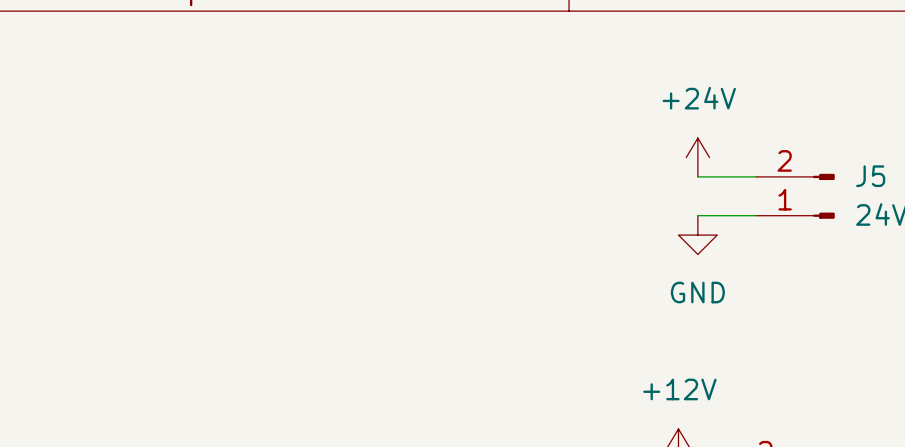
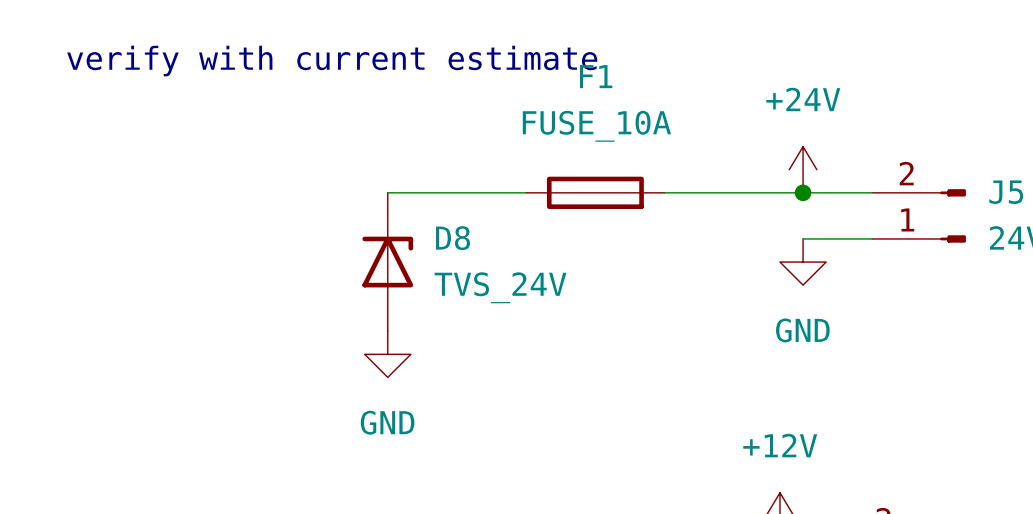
text: none -> verify with current estimate (332, 61)
wire: none -> (387, 192) (526, 192)
F1: none -> FUSE_10A (595, 192)
wire: none -> (664, 192) (803, 192)
junction: none -> (803, 192)
D8: none -> TVS_24V (387, 262)
power symbol: none -> GND (387, 354)

